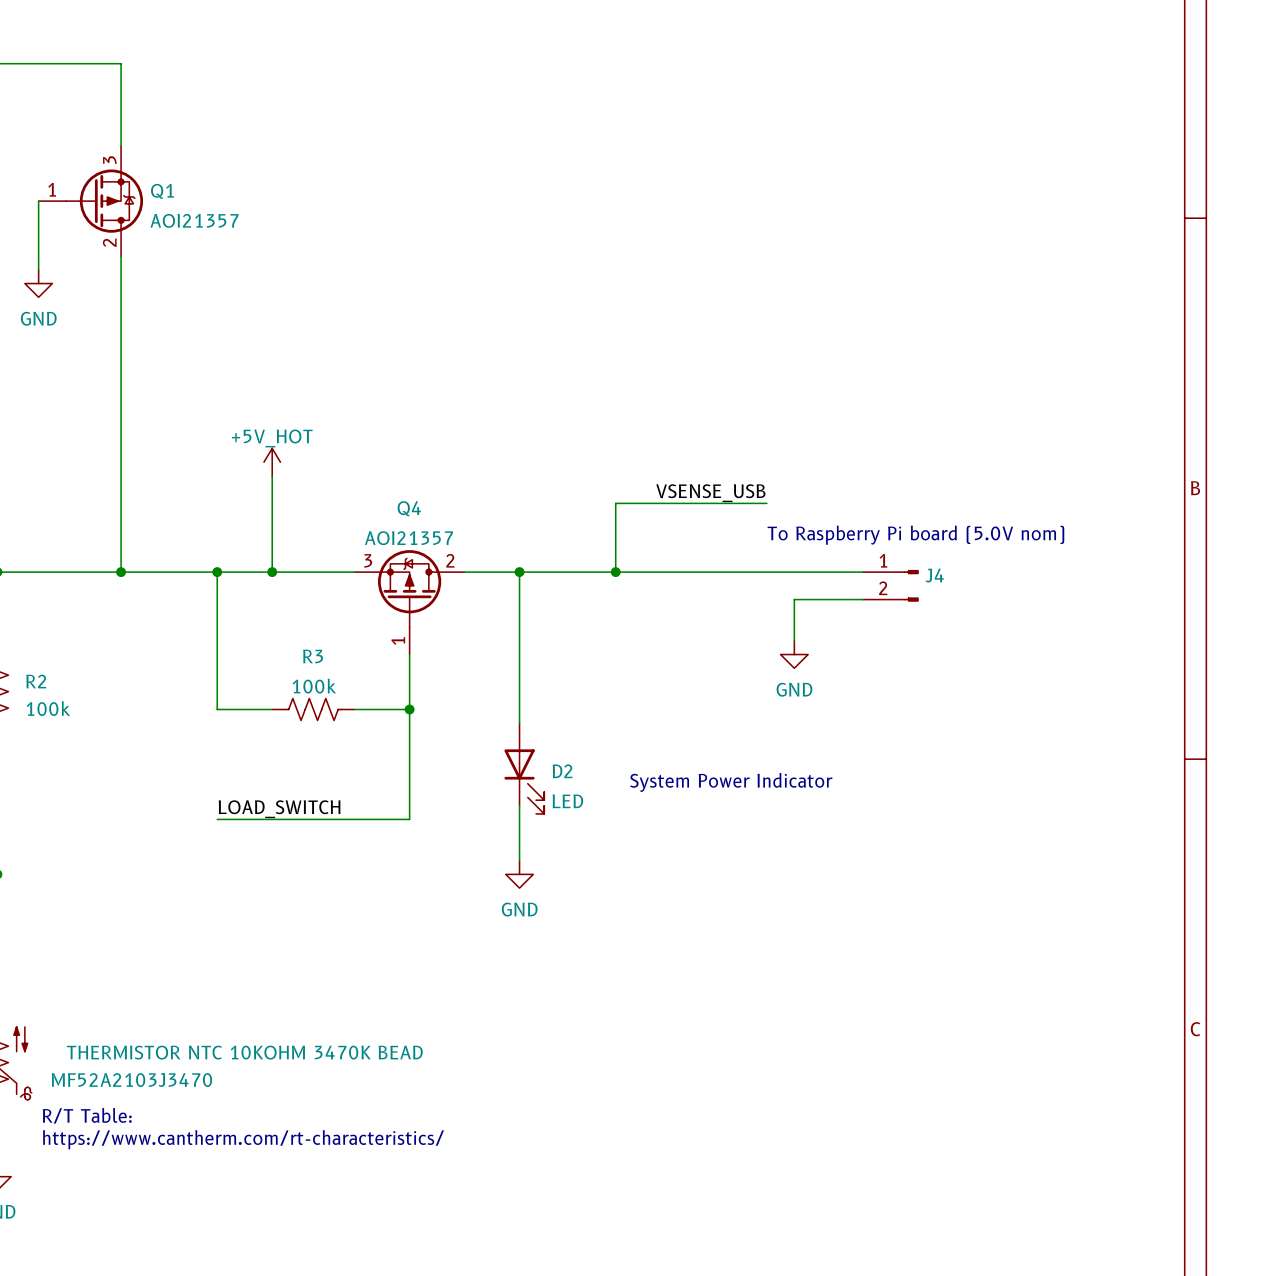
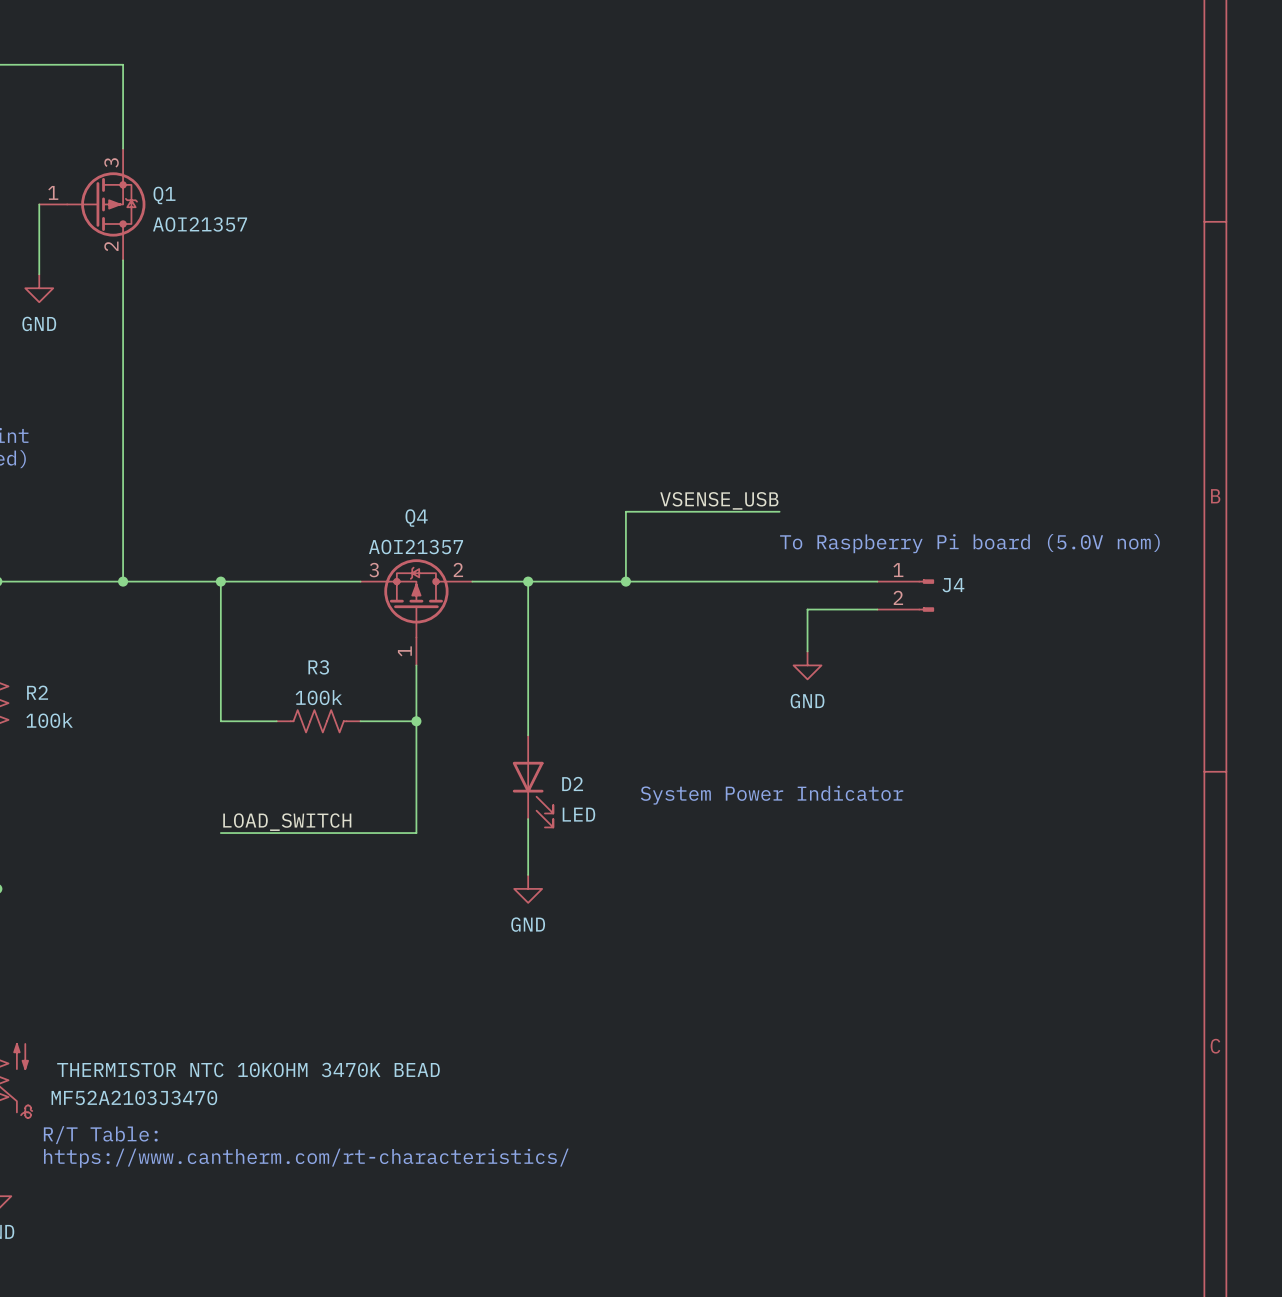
power symbol: +5V_HOT (272, 462) -> none
wire: (272, 475) (272, 572) -> none
junction: (272, 572) -> none

